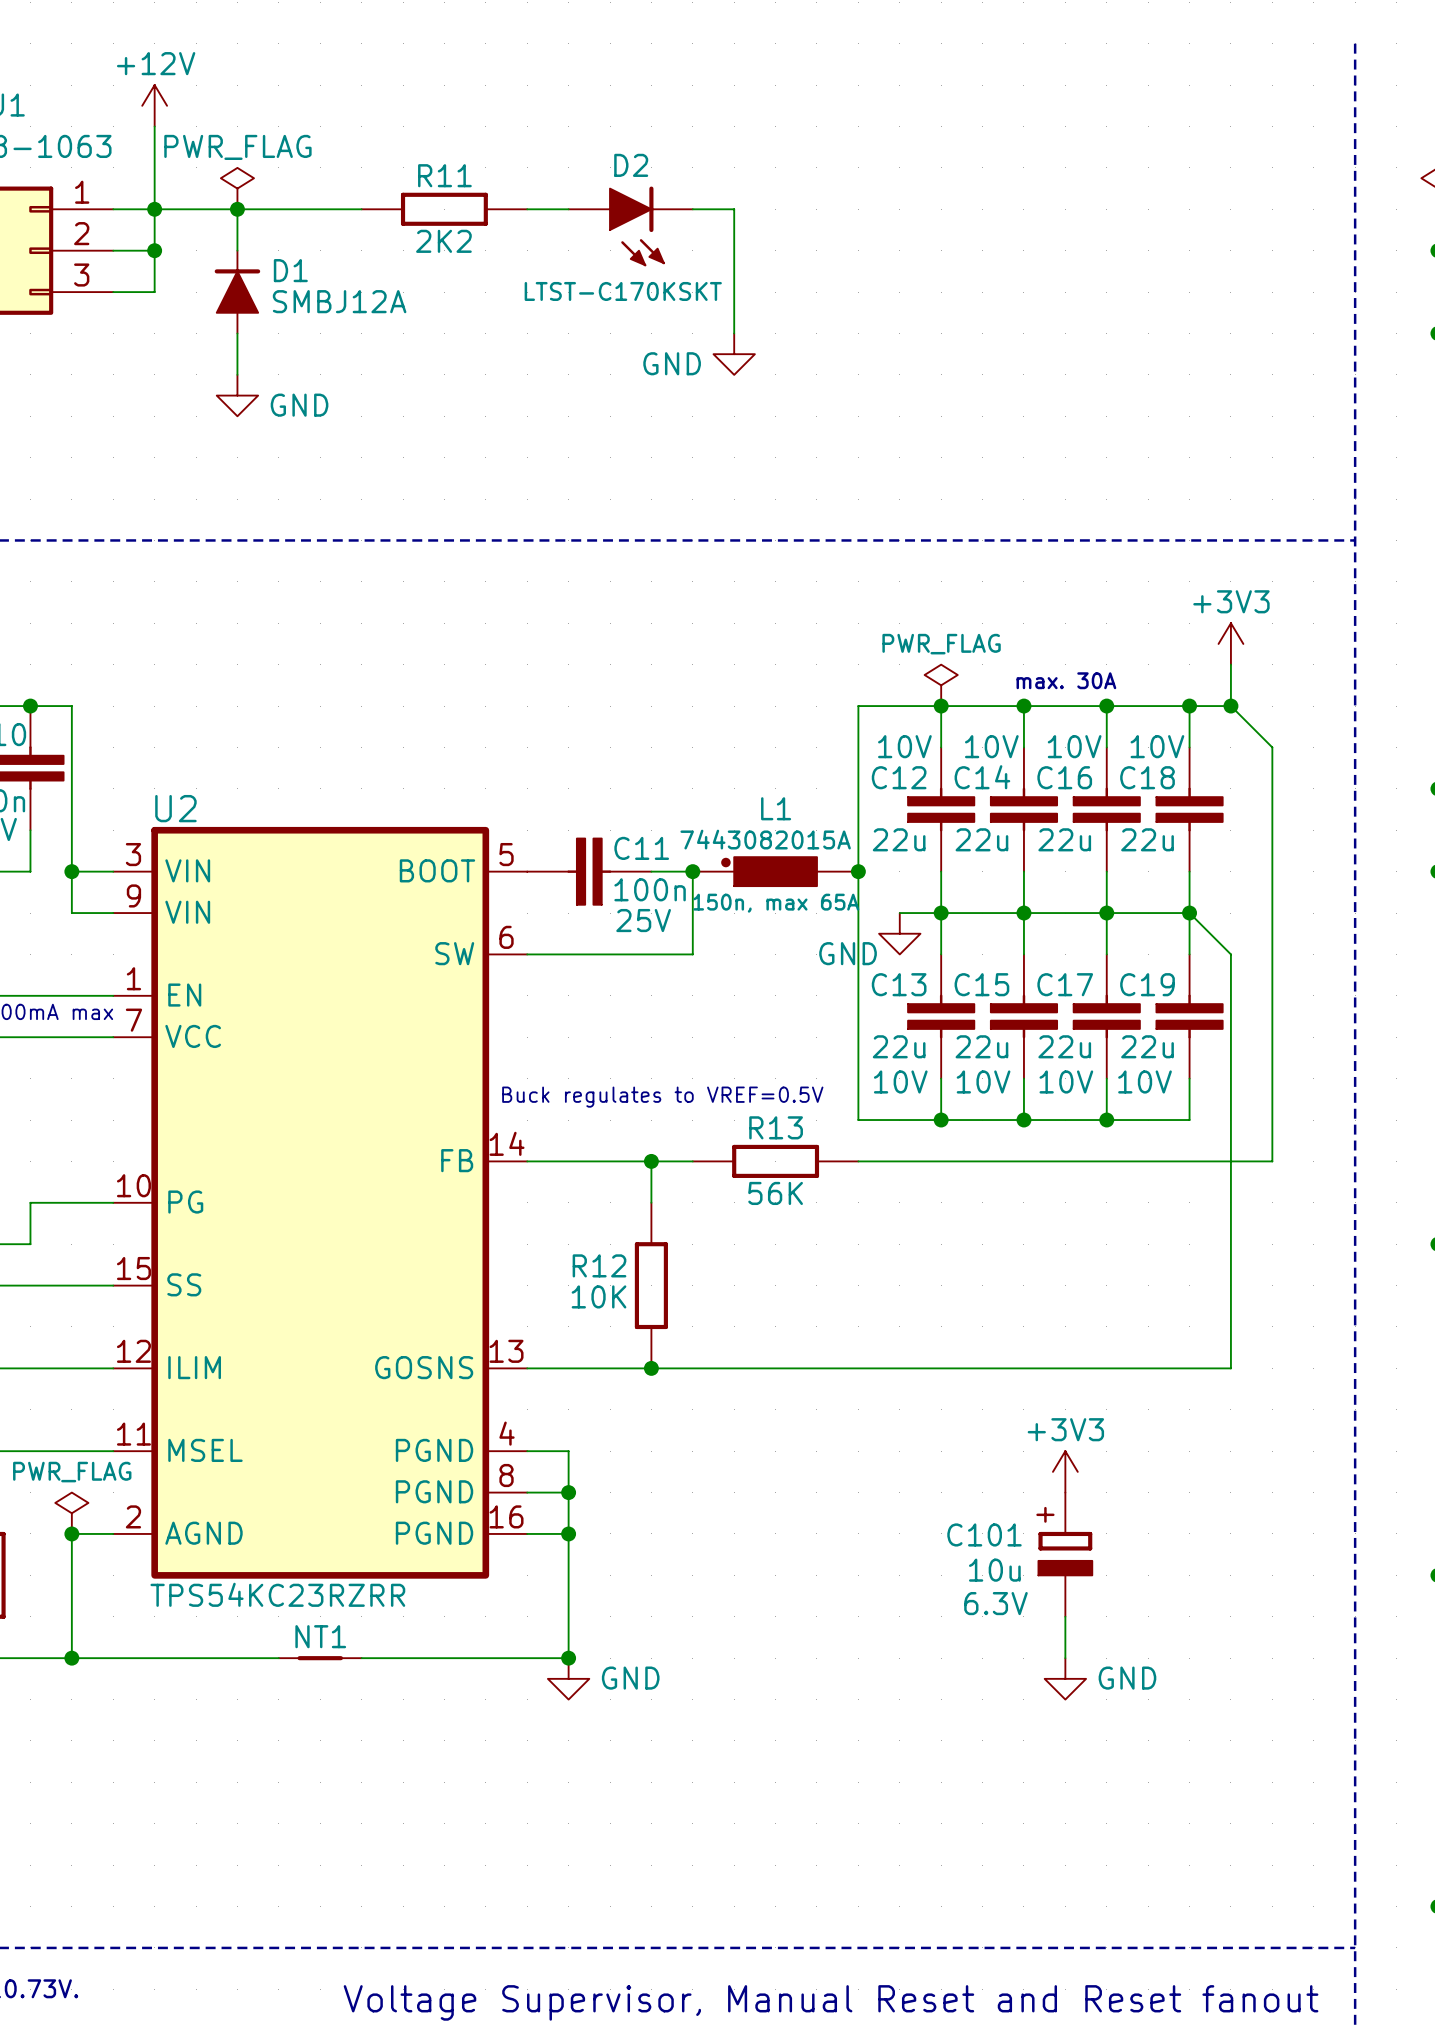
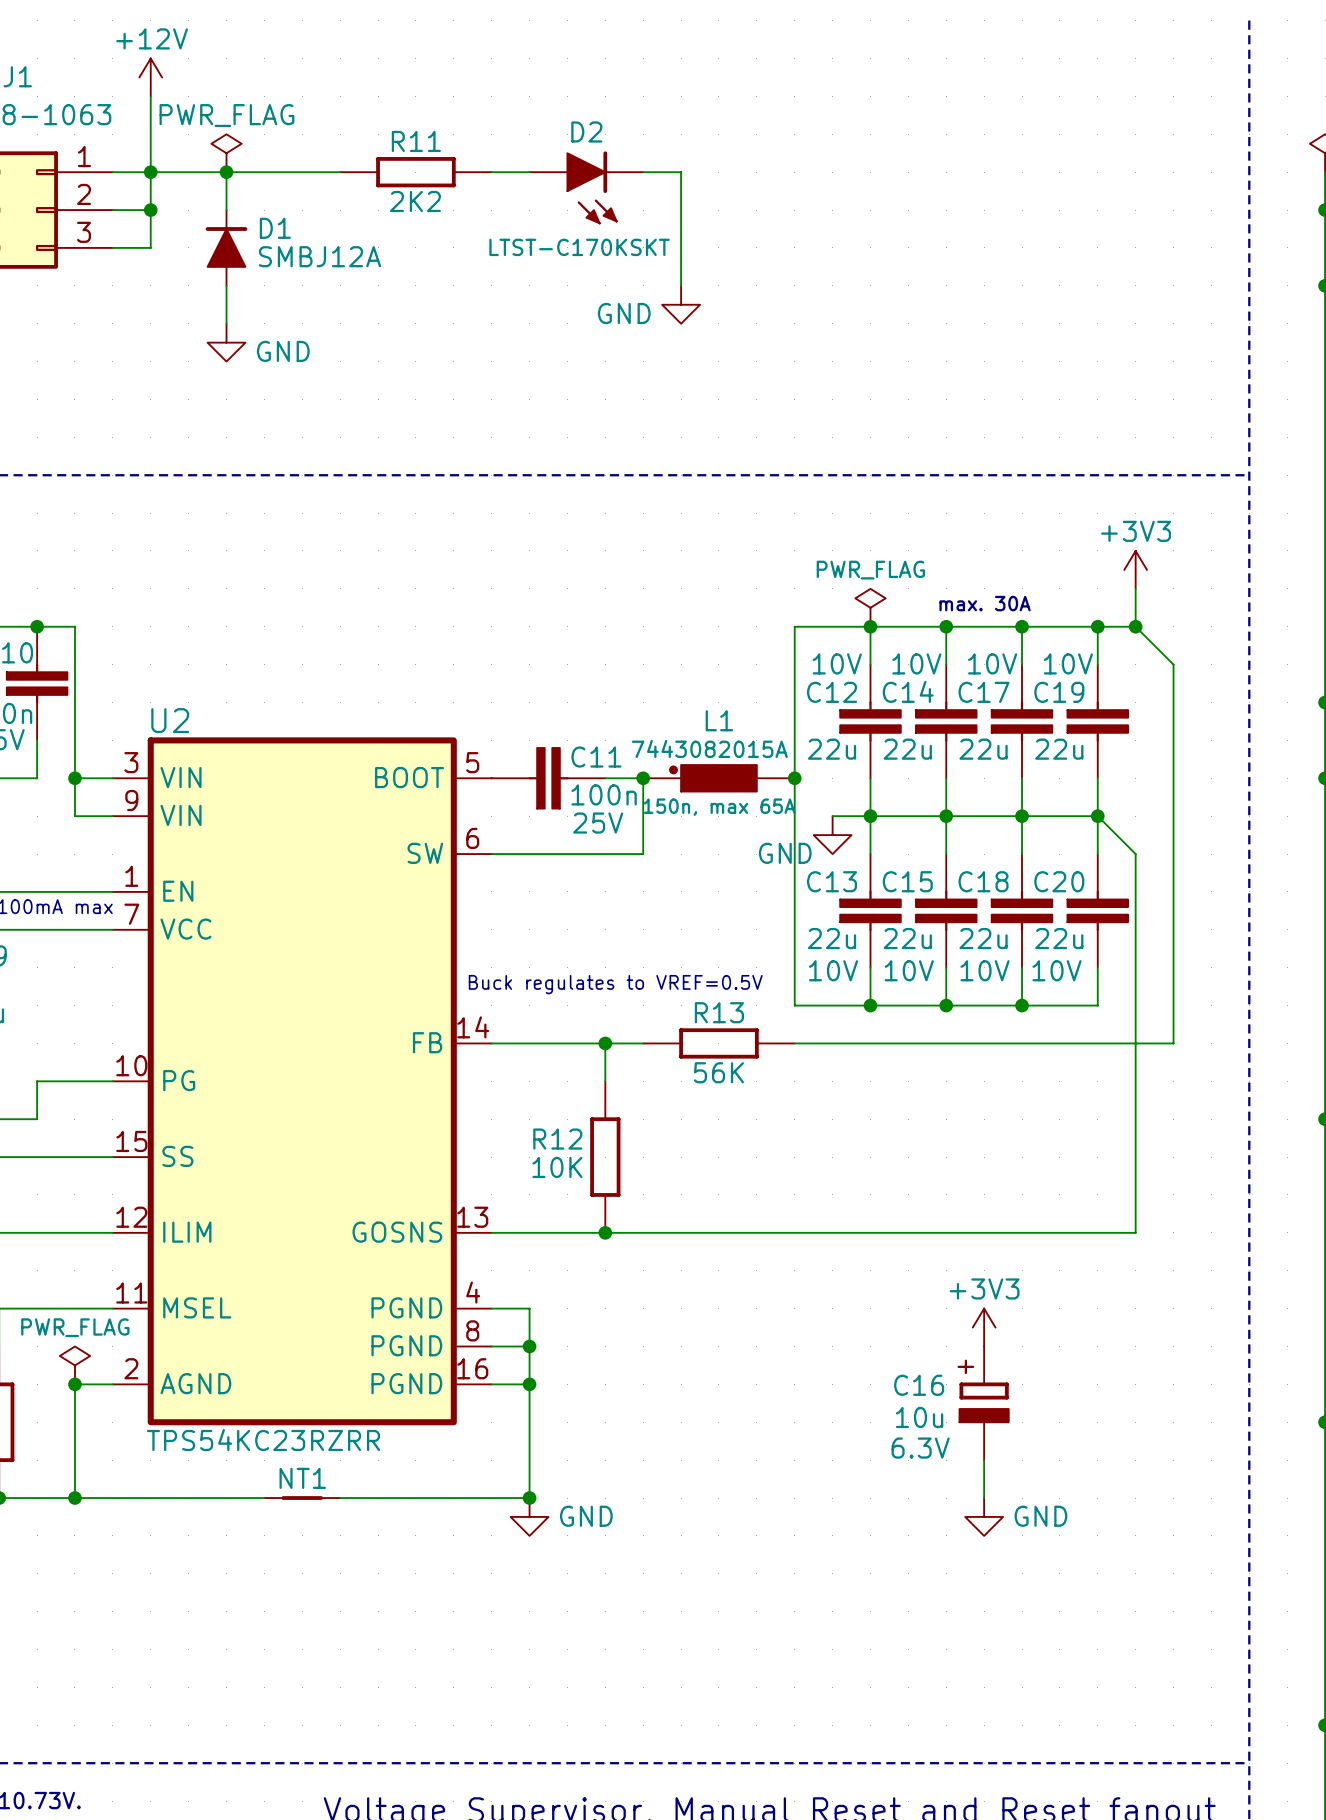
C16 name: C16 (1064, 777) -> C17 (983, 692)
C18 name: C18 (1147, 777) -> C19 (1059, 692)
C17 name: C17 (1065, 984) -> C18 (983, 881)
C19 name: C19 (1147, 984) -> C20 (1059, 881)
C101 name: C101 (984, 1534) -> C16 (919, 1385)

